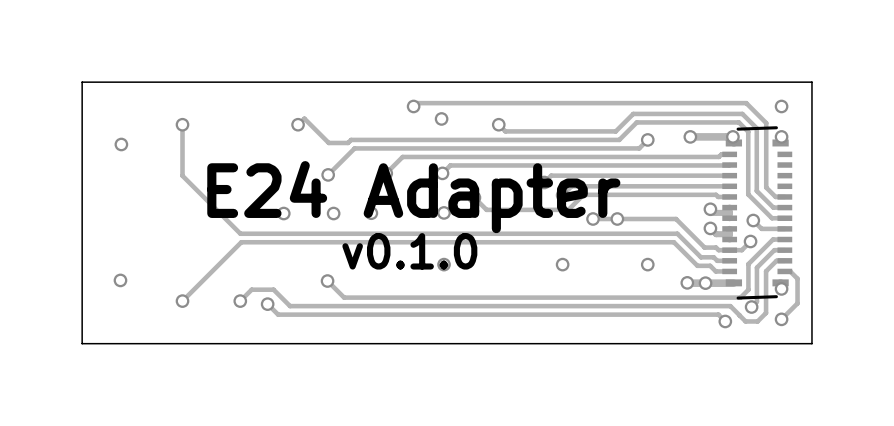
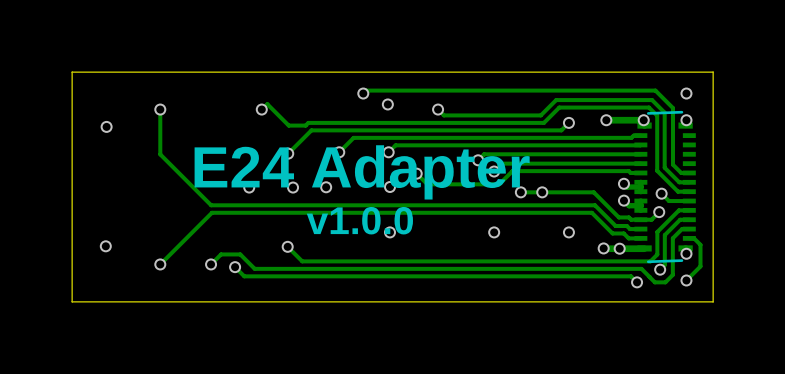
text: v0.1.0 (409, 251) -> v1.0.0 (359, 220)

